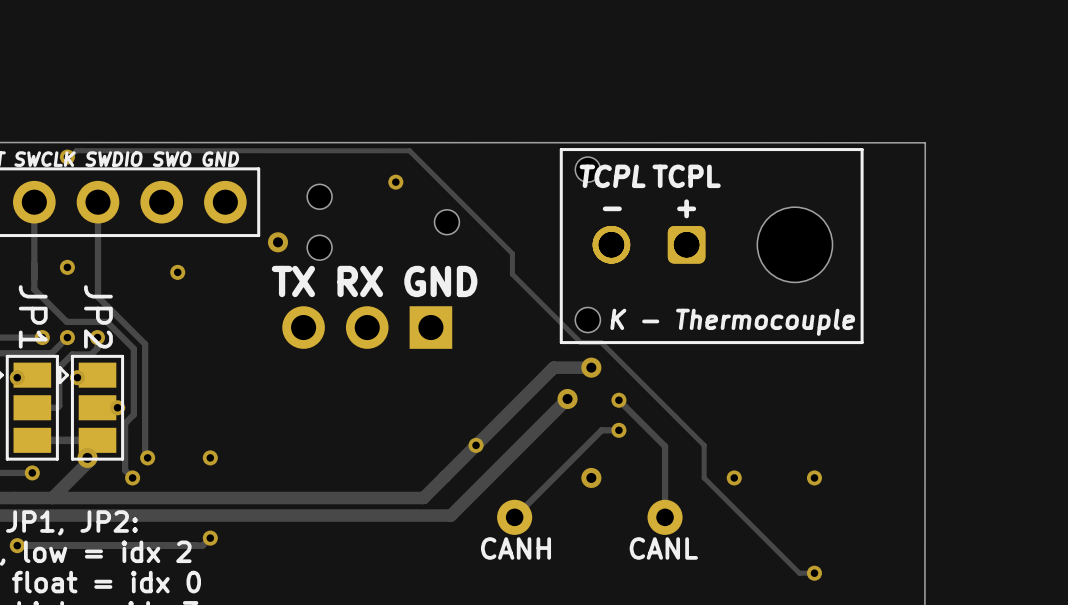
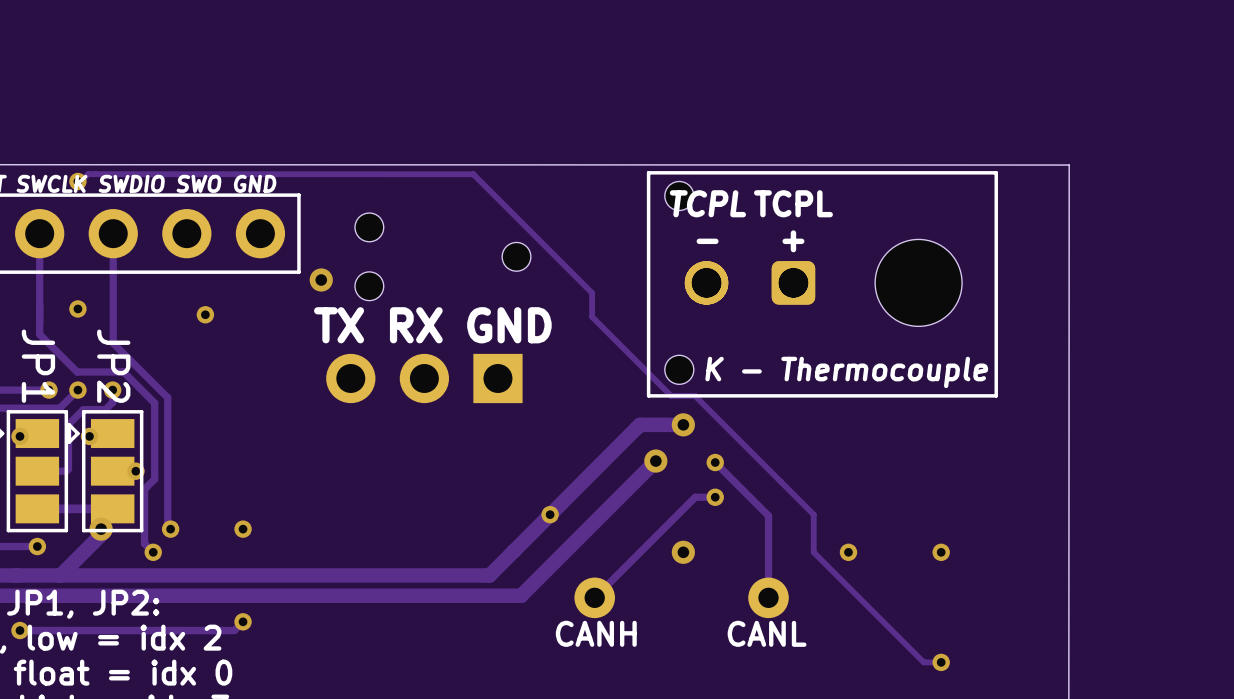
via: (395, 182) -> none

